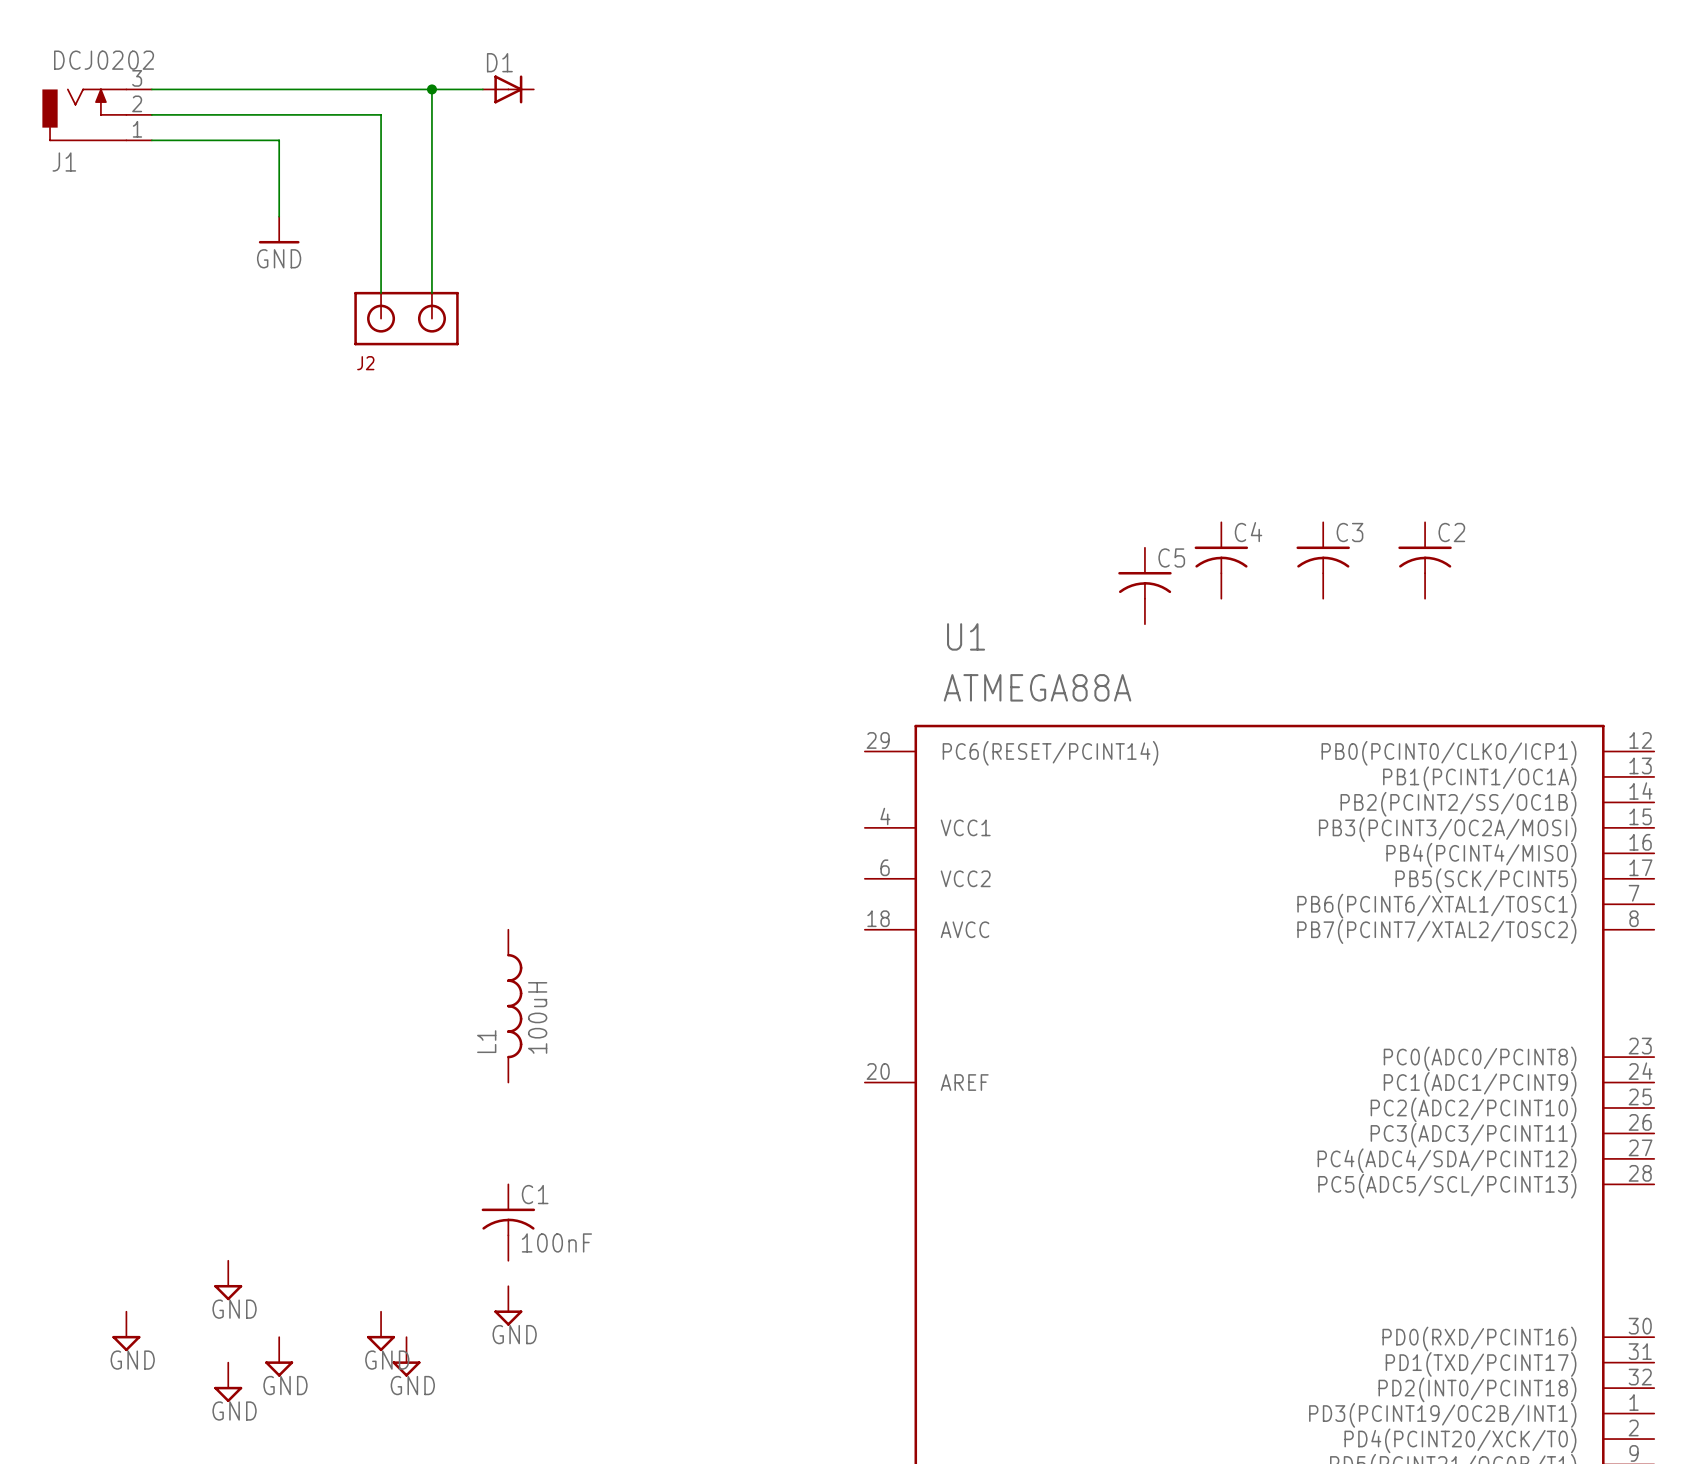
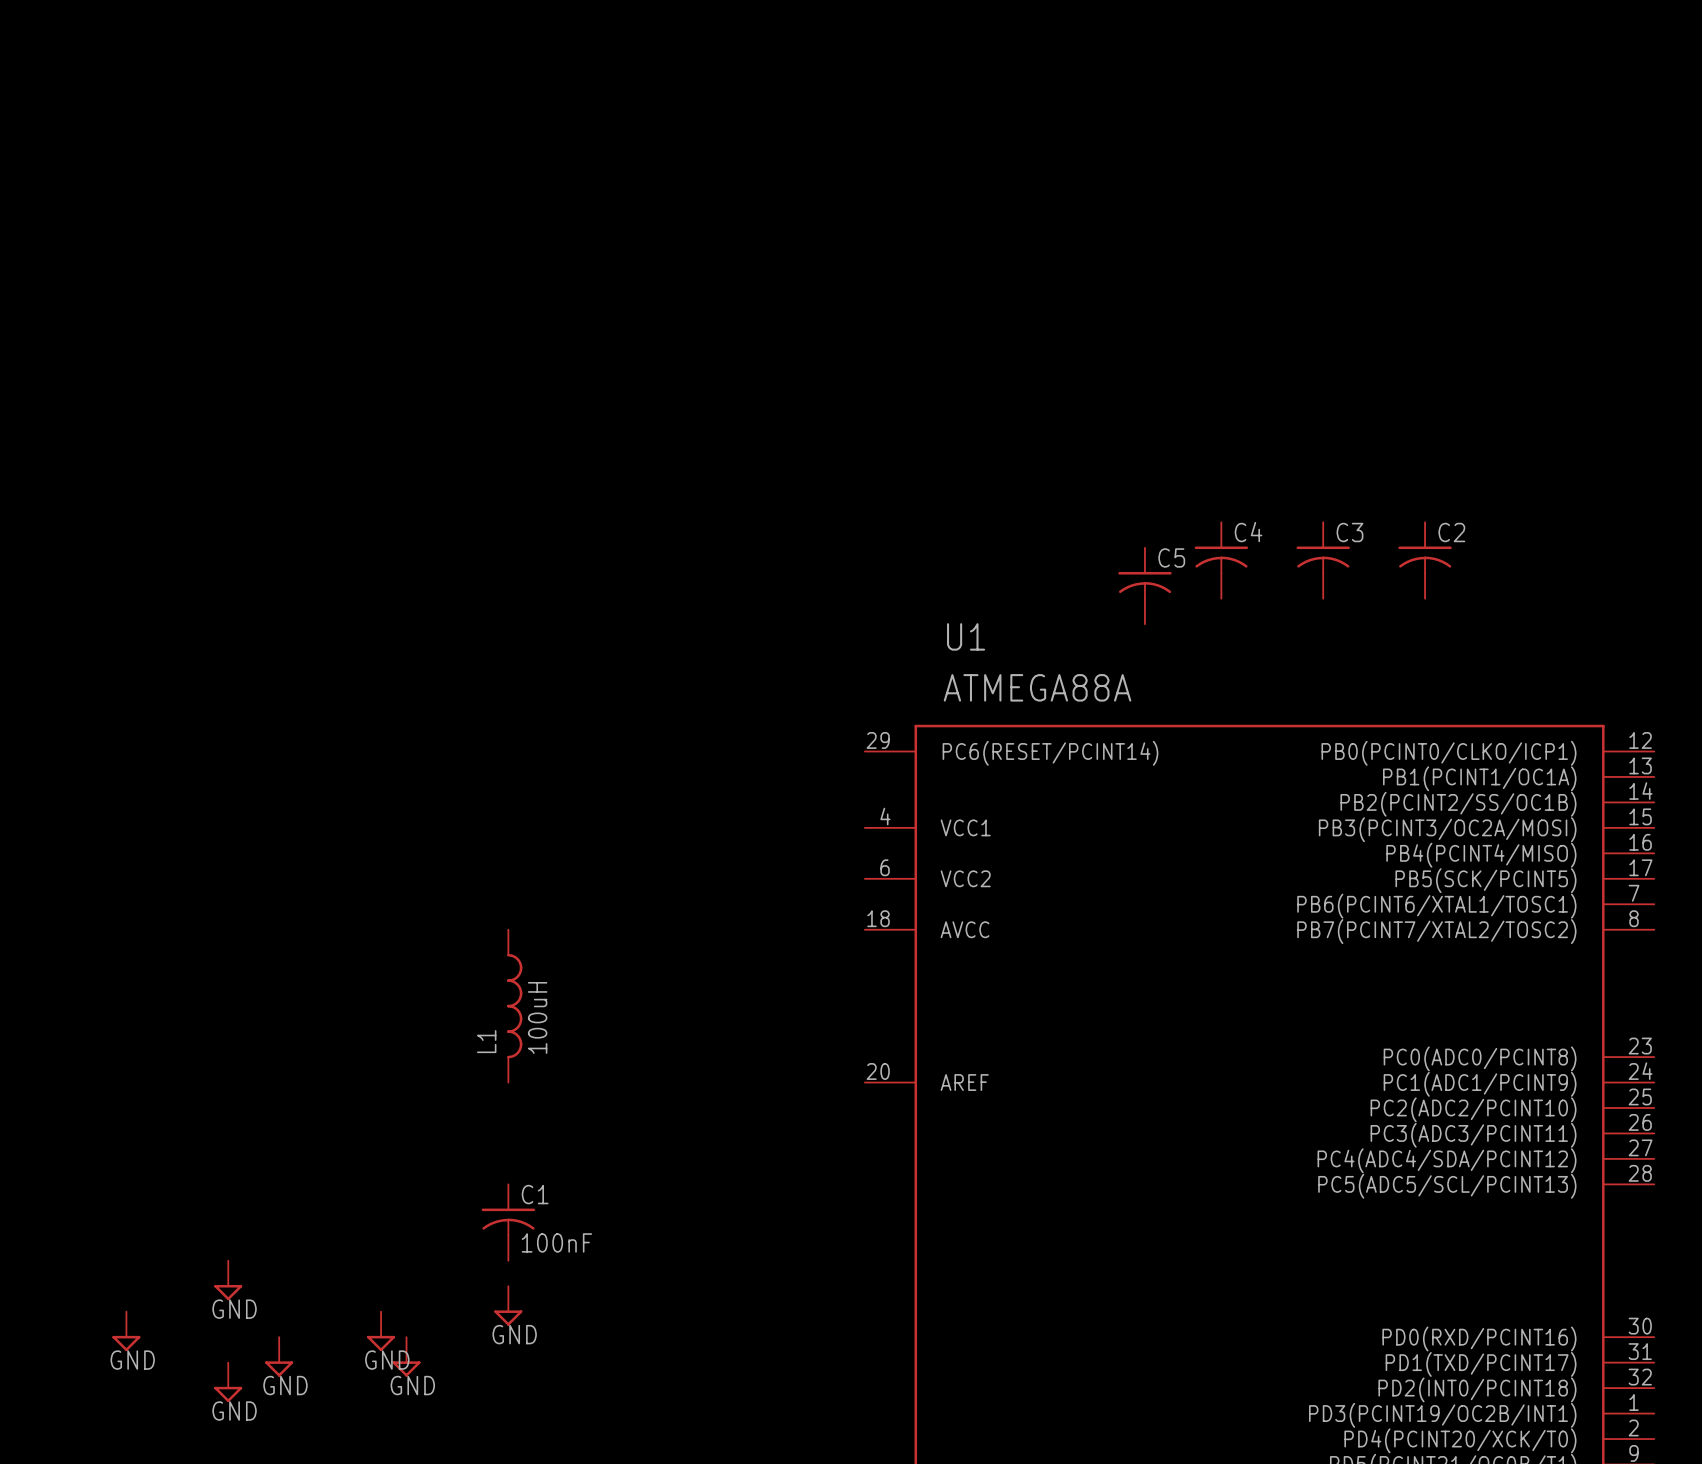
wire: (151, 89) (482, 89) -> none
wire: (431, 89) (431, 293) -> none
junction: (431, 89) -> none
D1: (508, 89) -> none
J1: DCJ0202 (97, 114) -> none
wire: (151, 114) (381, 114) (381, 293) -> none
wire: (151, 140) (279, 140) (279, 216) -> none
power symbol: GND (279, 230) -> none
J2: (406, 318) -> none

